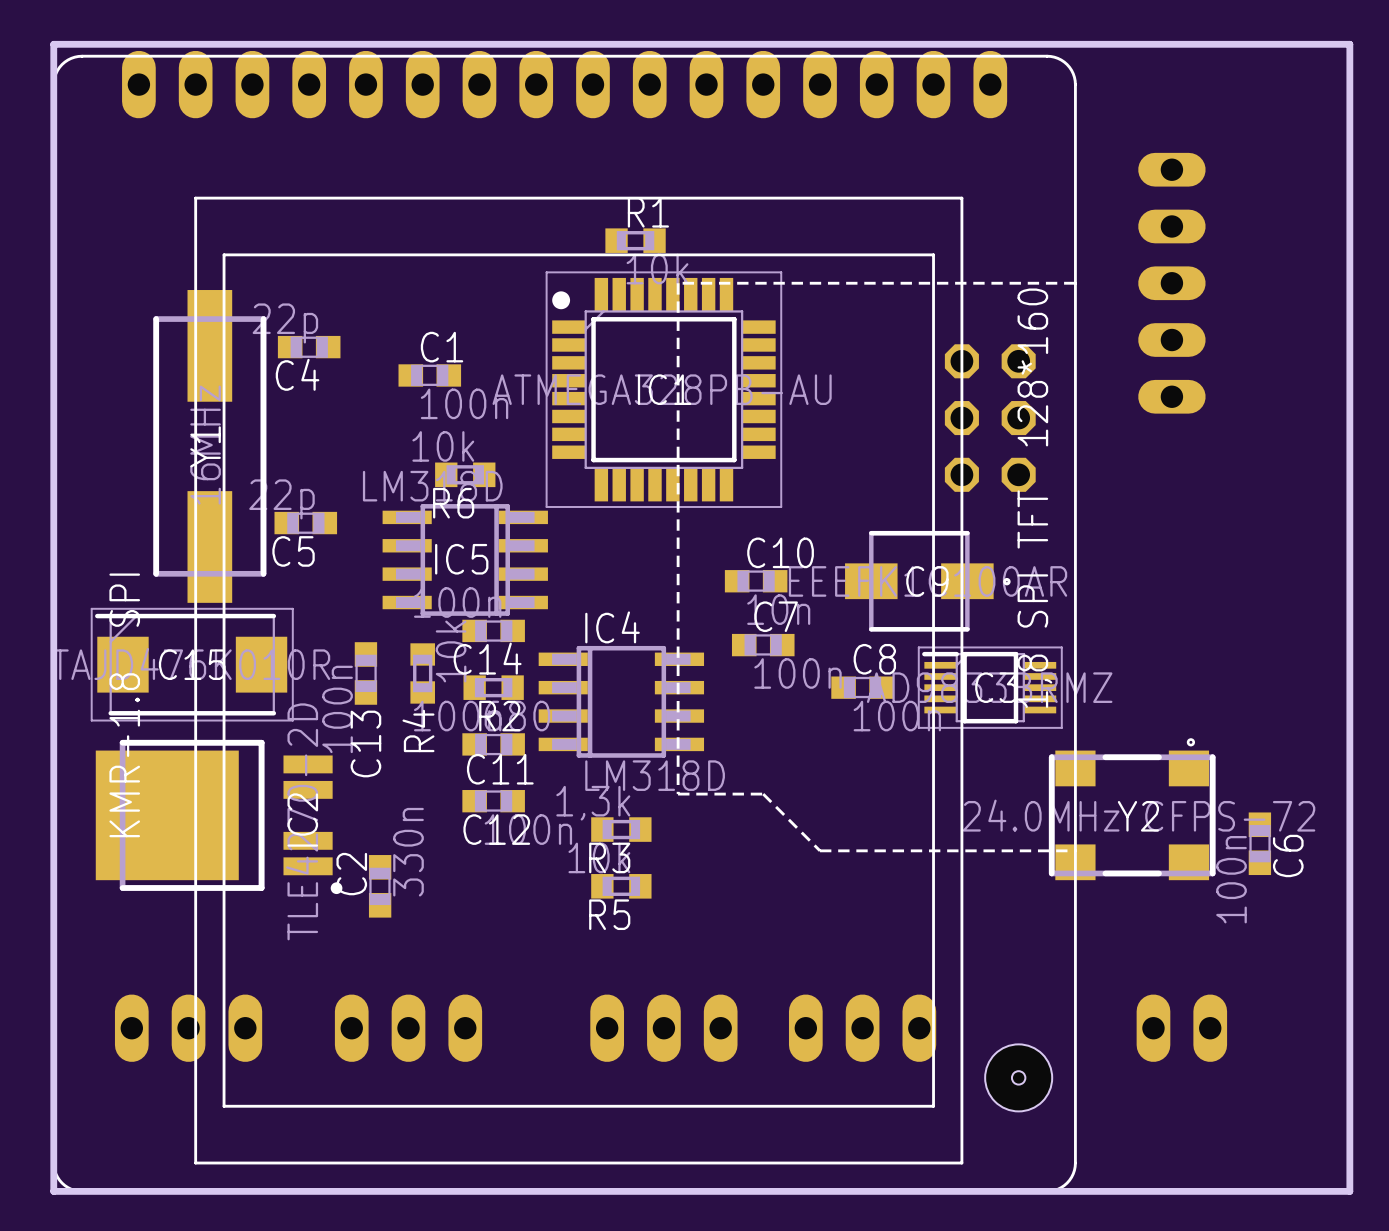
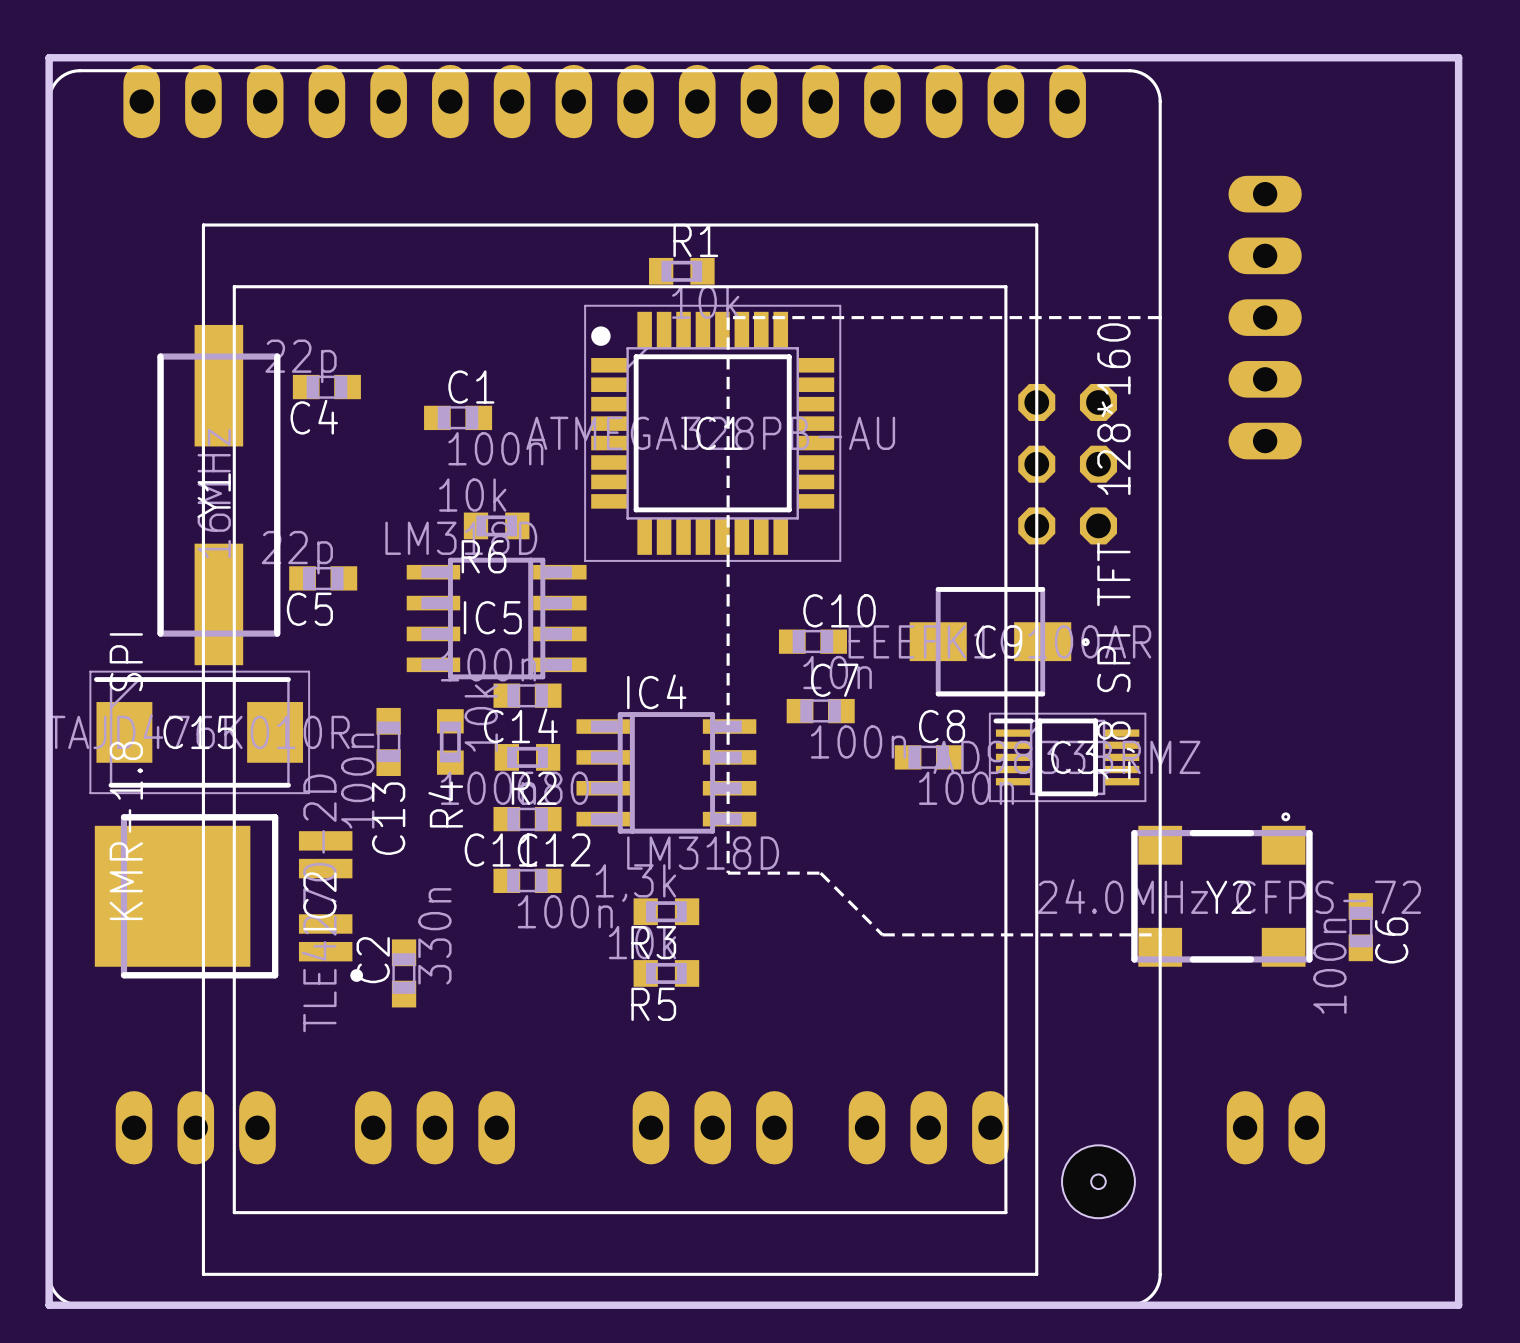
C11 name position: C11 (500, 769) -> C11 (500, 849)
C12 name position: C12 (496, 829) -> C12 (554, 849)

